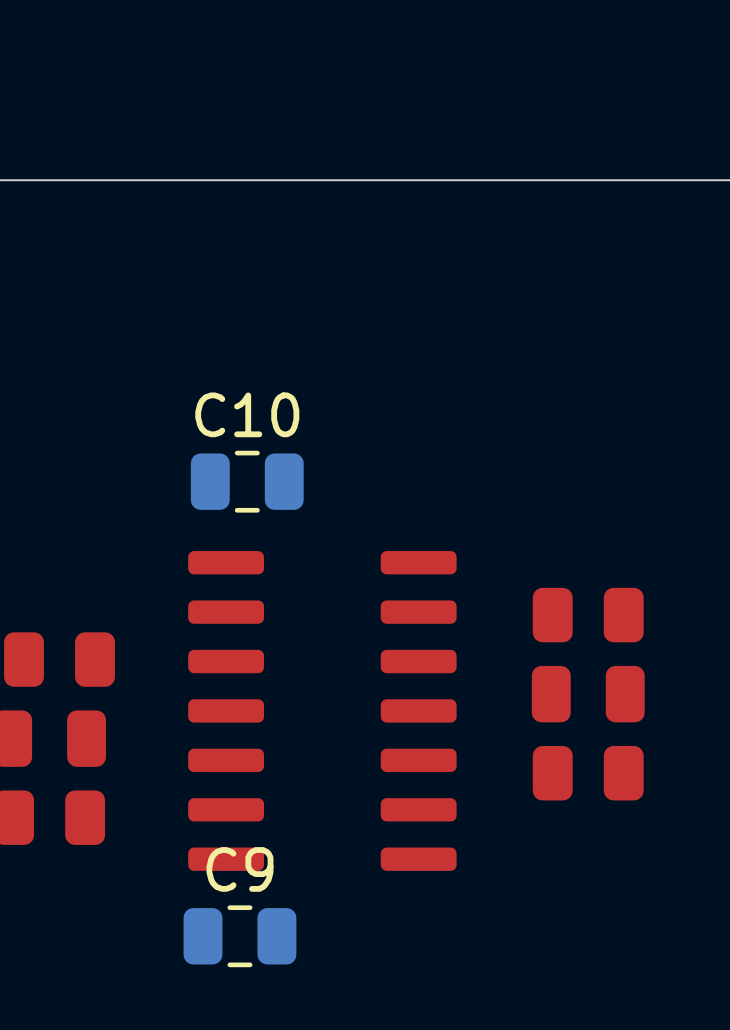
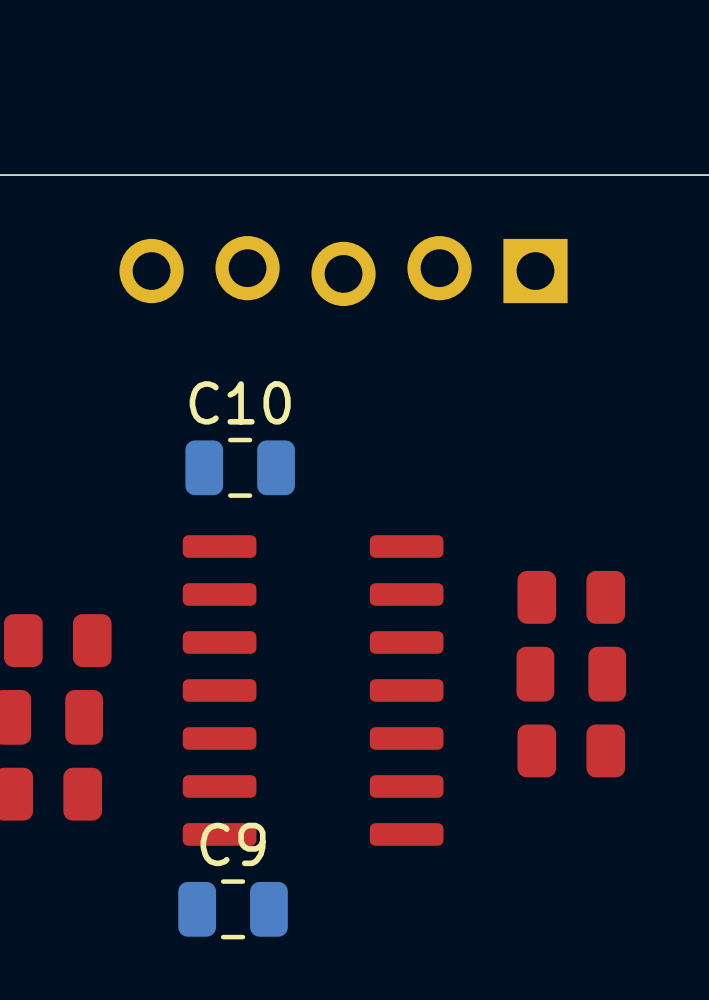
part: none -> (343, 271)

